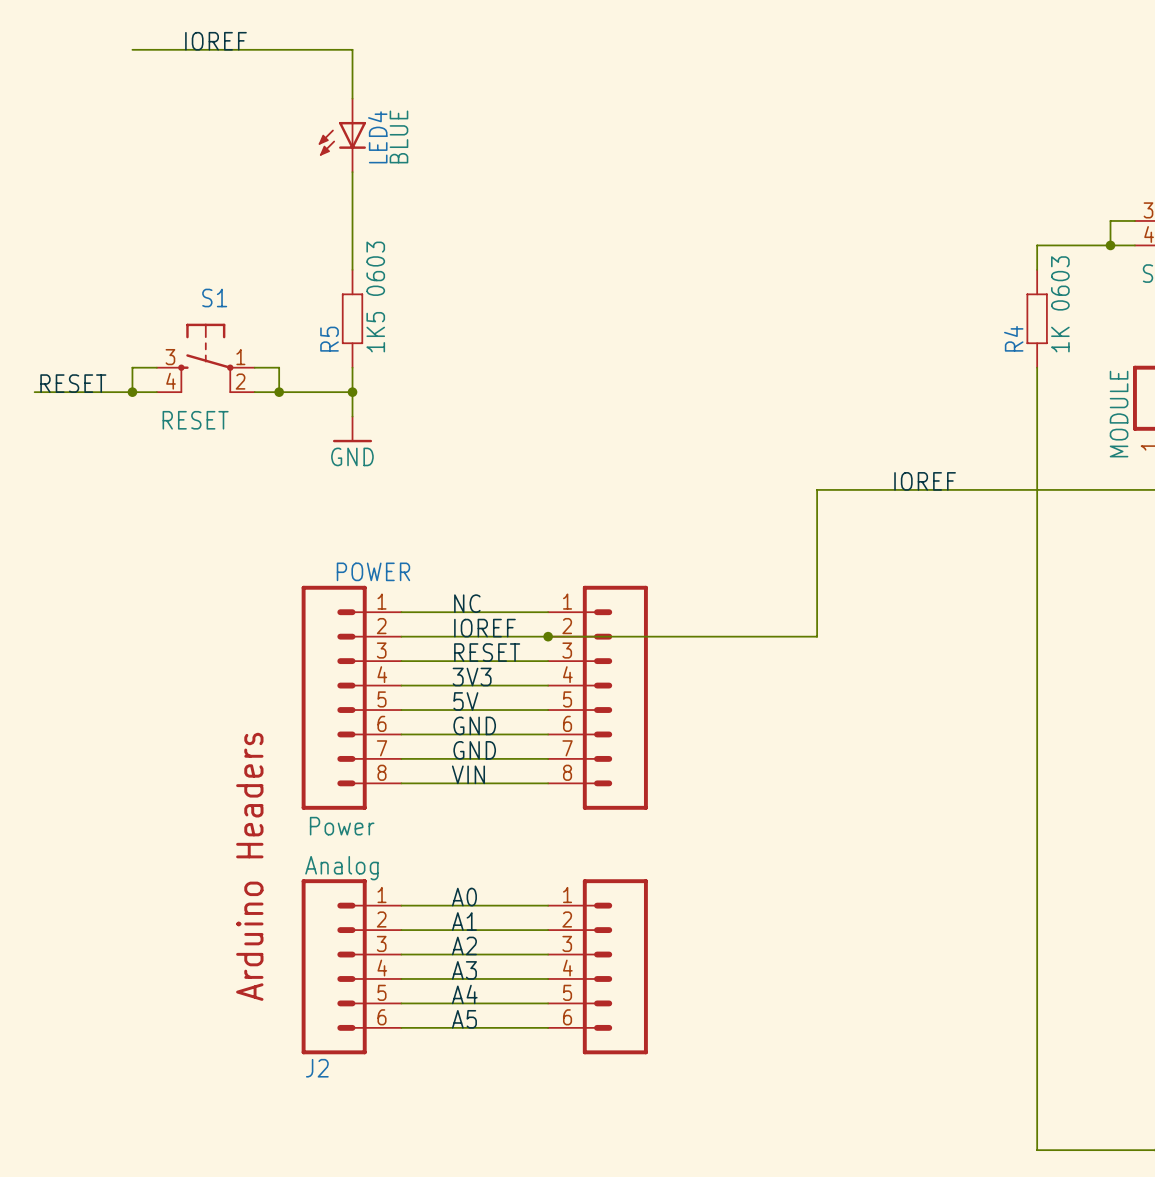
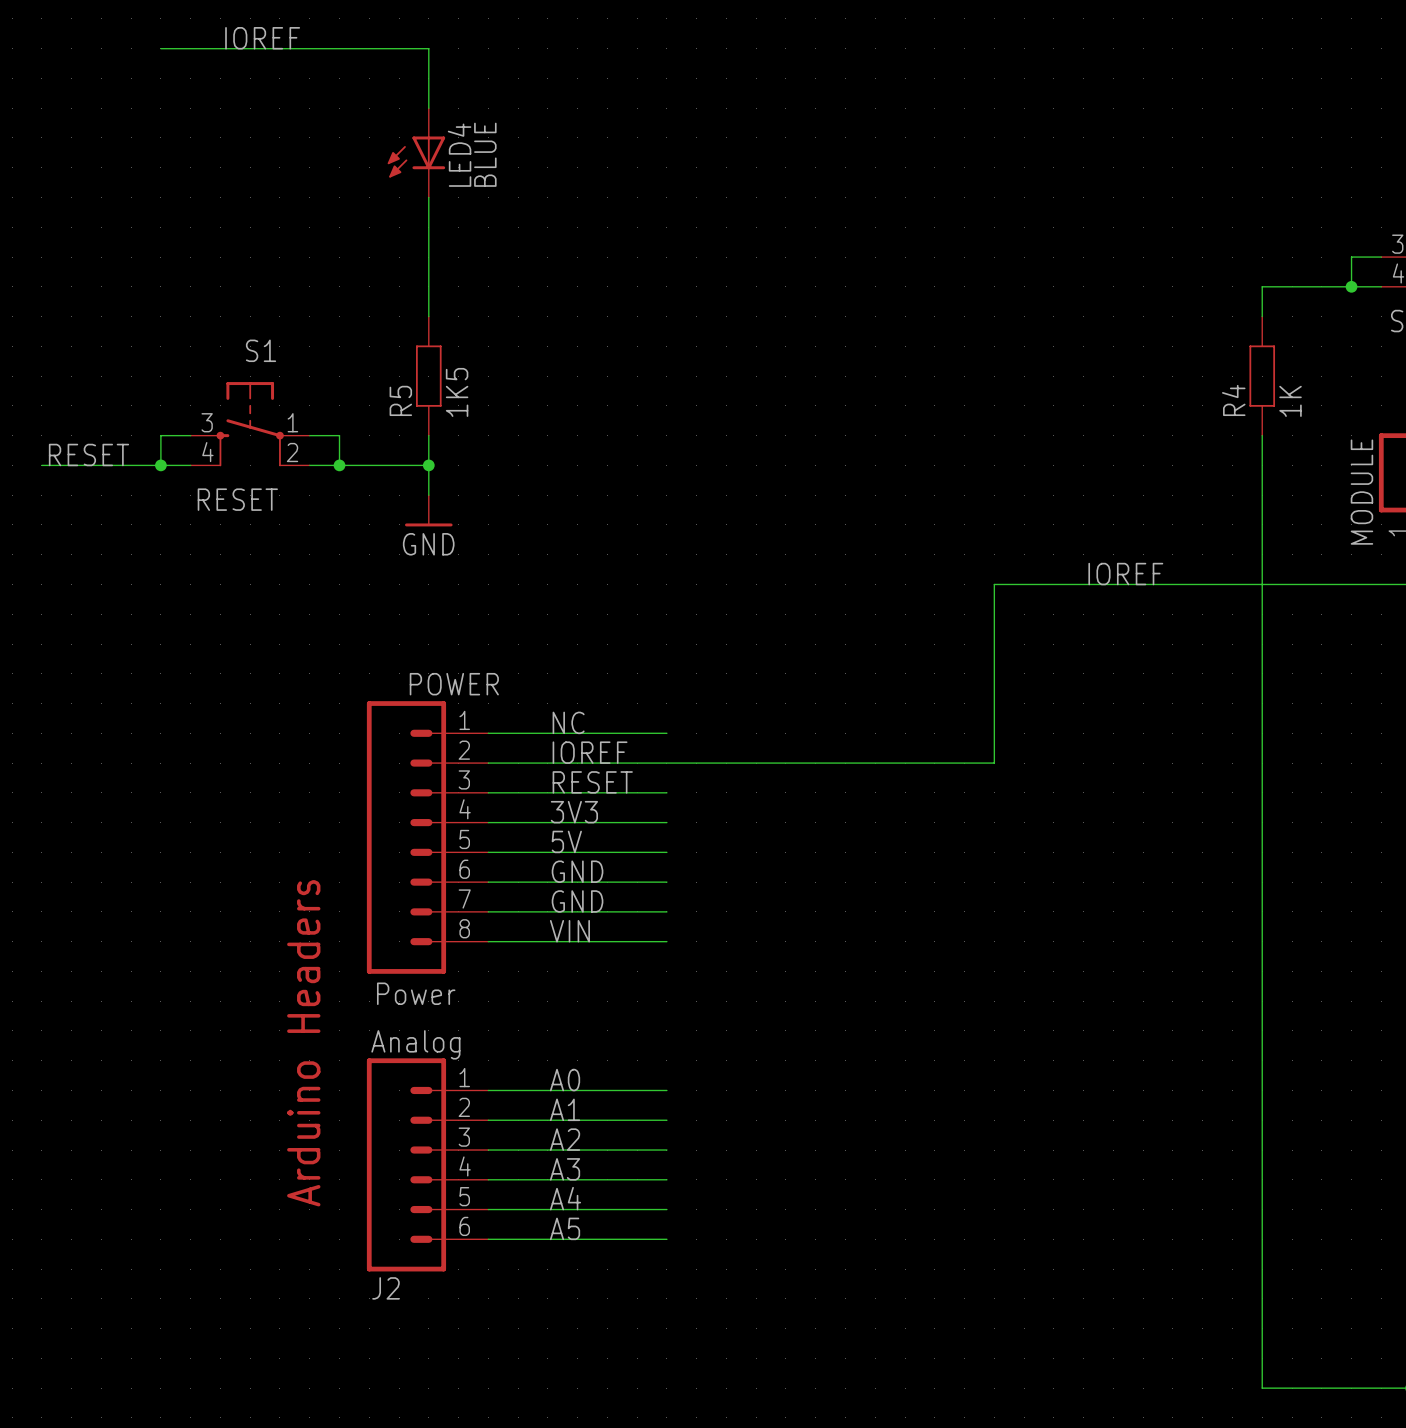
R5 value: 1K5 0603 (375, 296) -> 1K5 (457, 392)
R4 value: 1K 0603 (1060, 304) -> 1K (1290, 401)
junction: (548, 636) -> none
part: (598, 697) -> none
part: (598, 966) -> none

